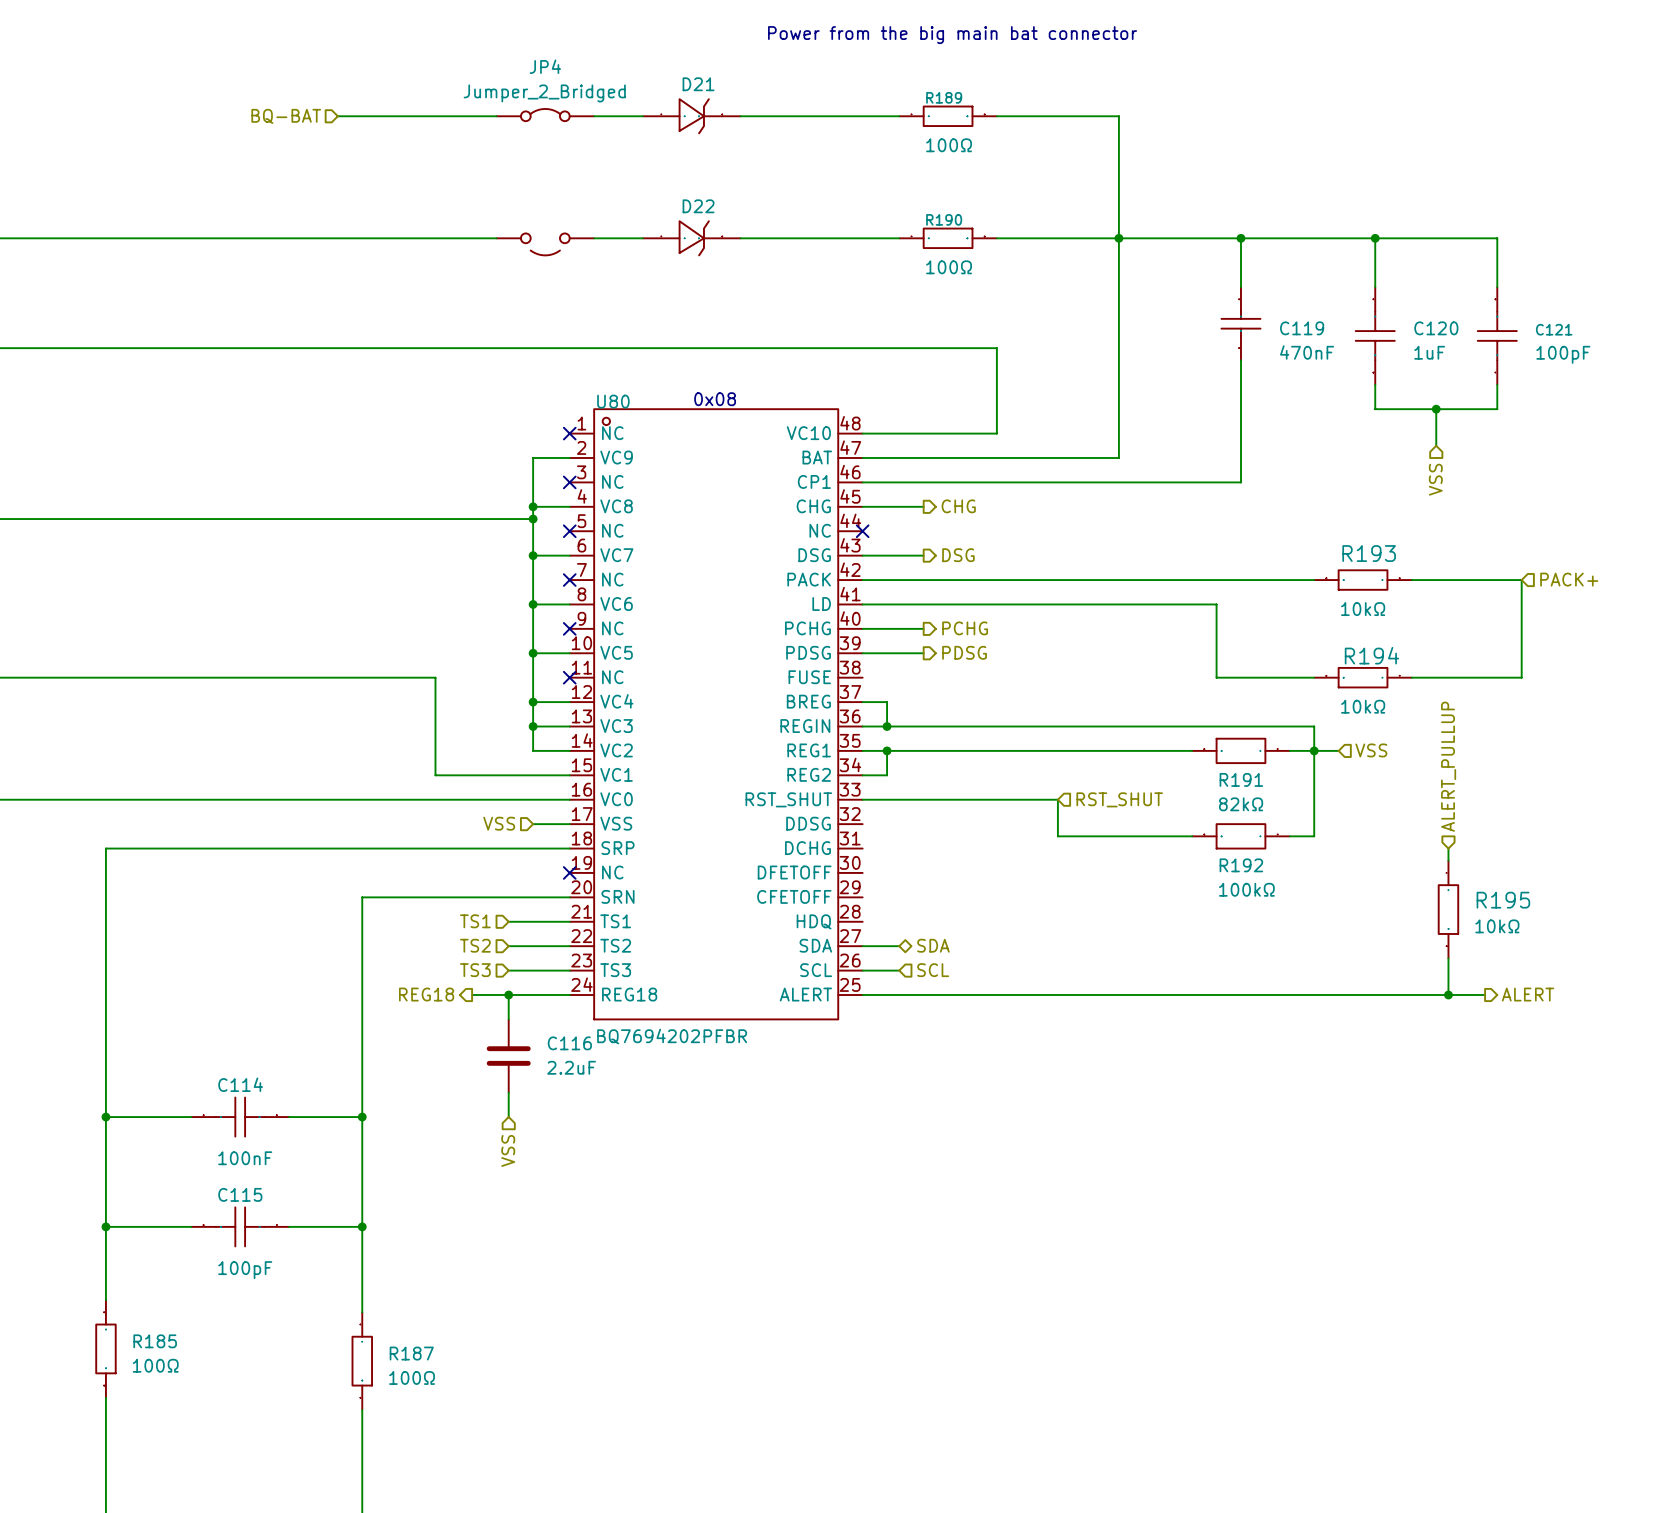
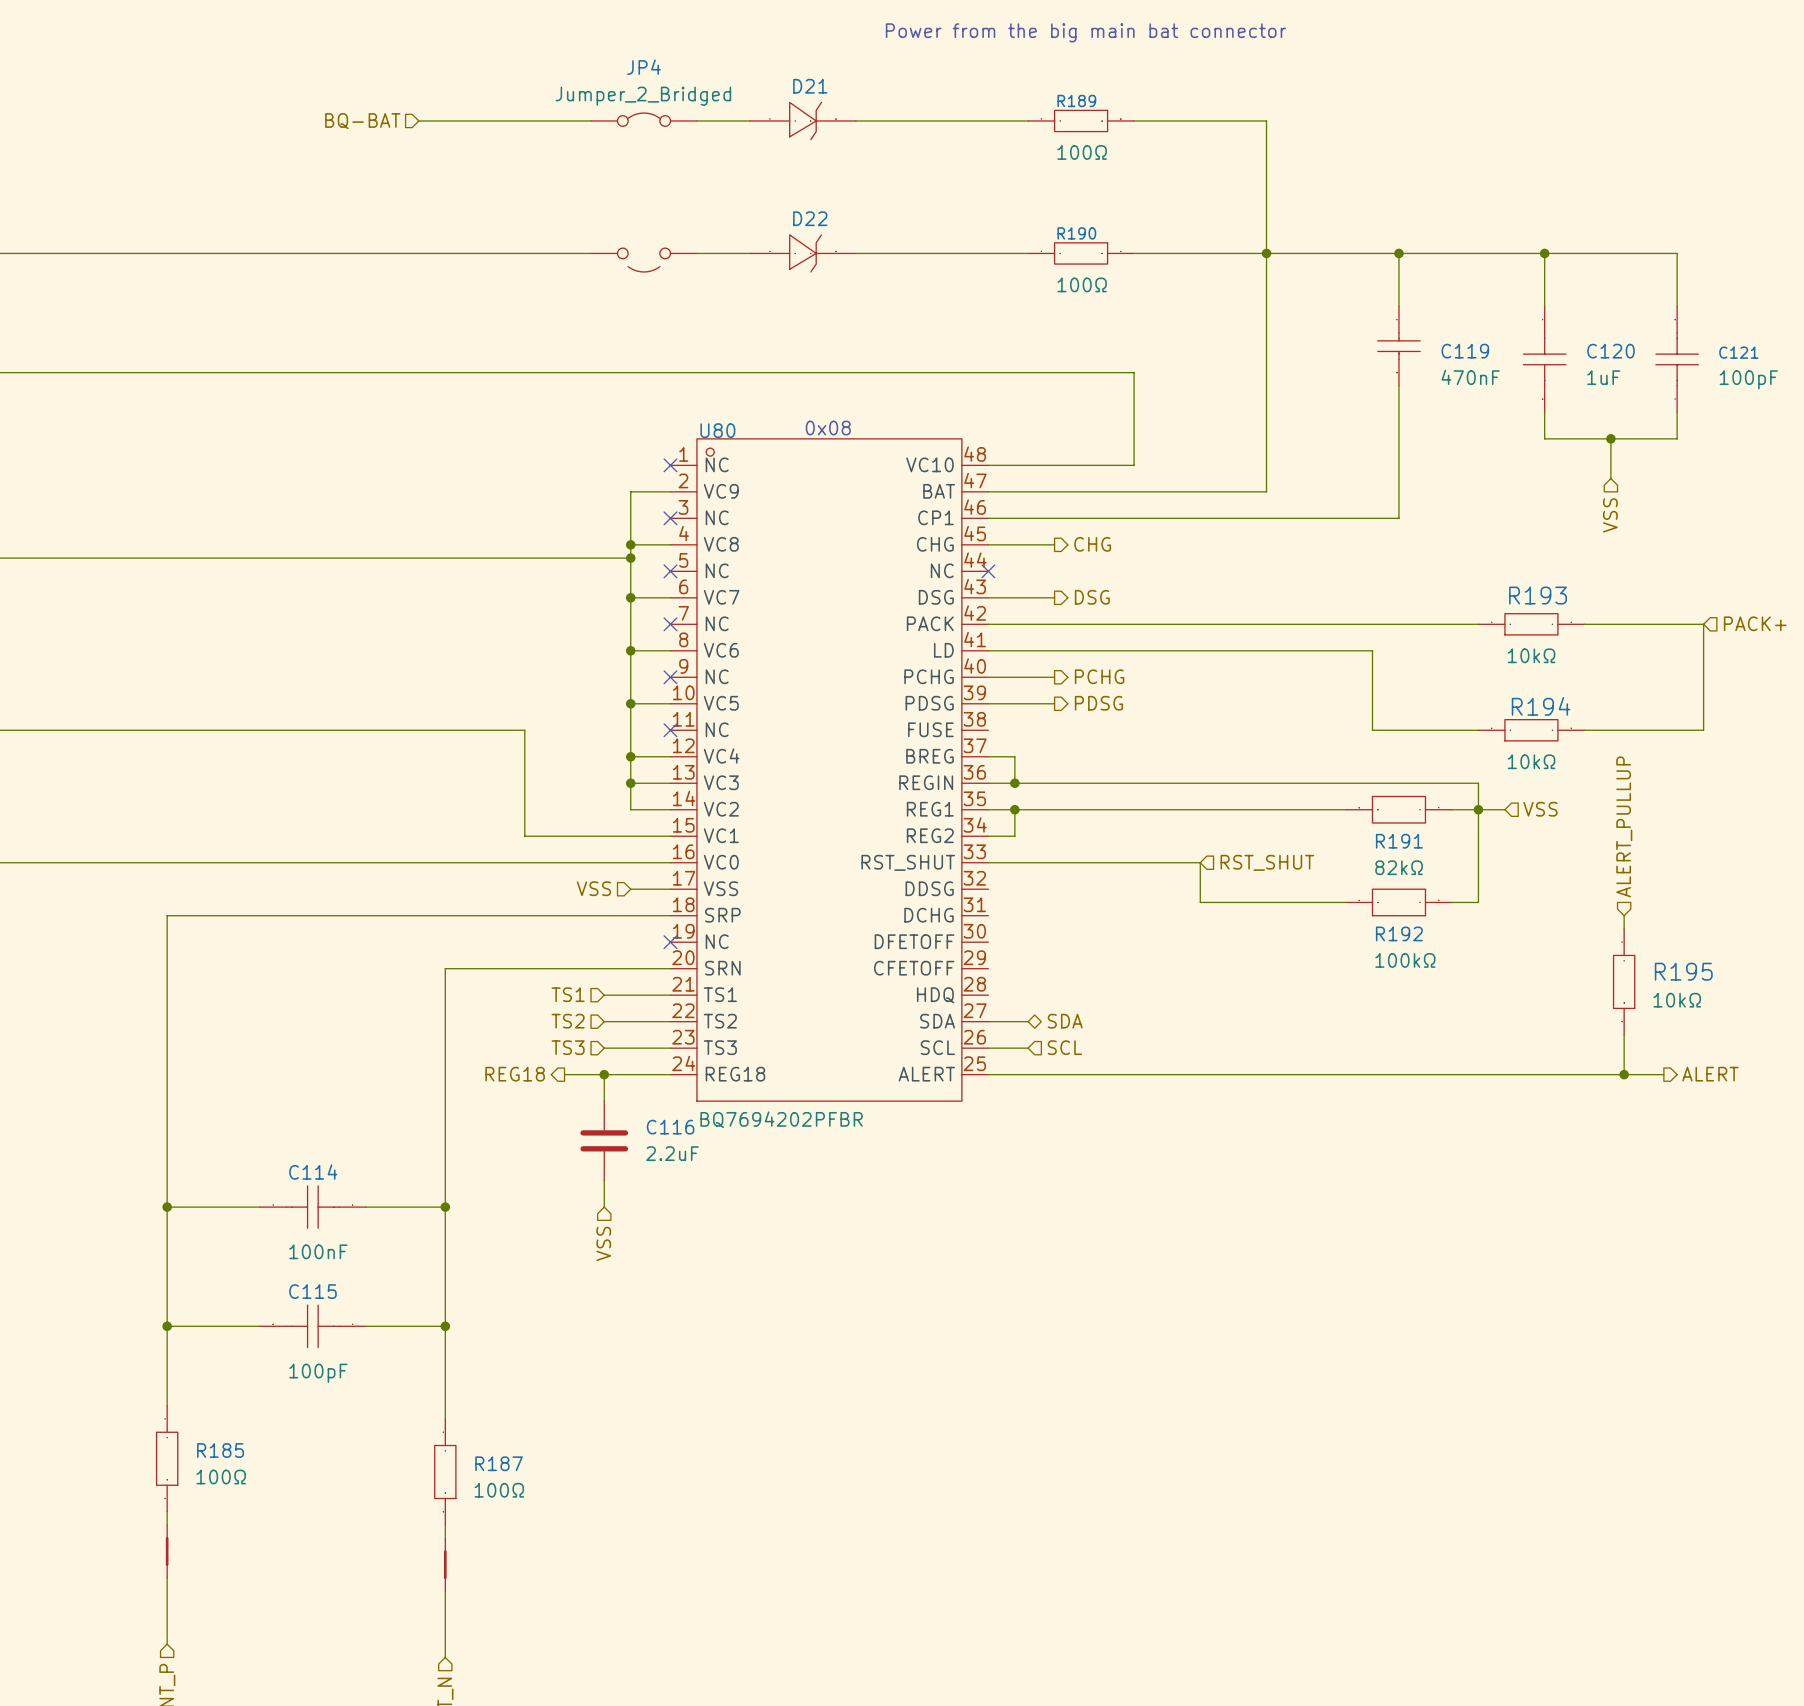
part: none -> (167, 1551)
part: none -> (445, 1564)

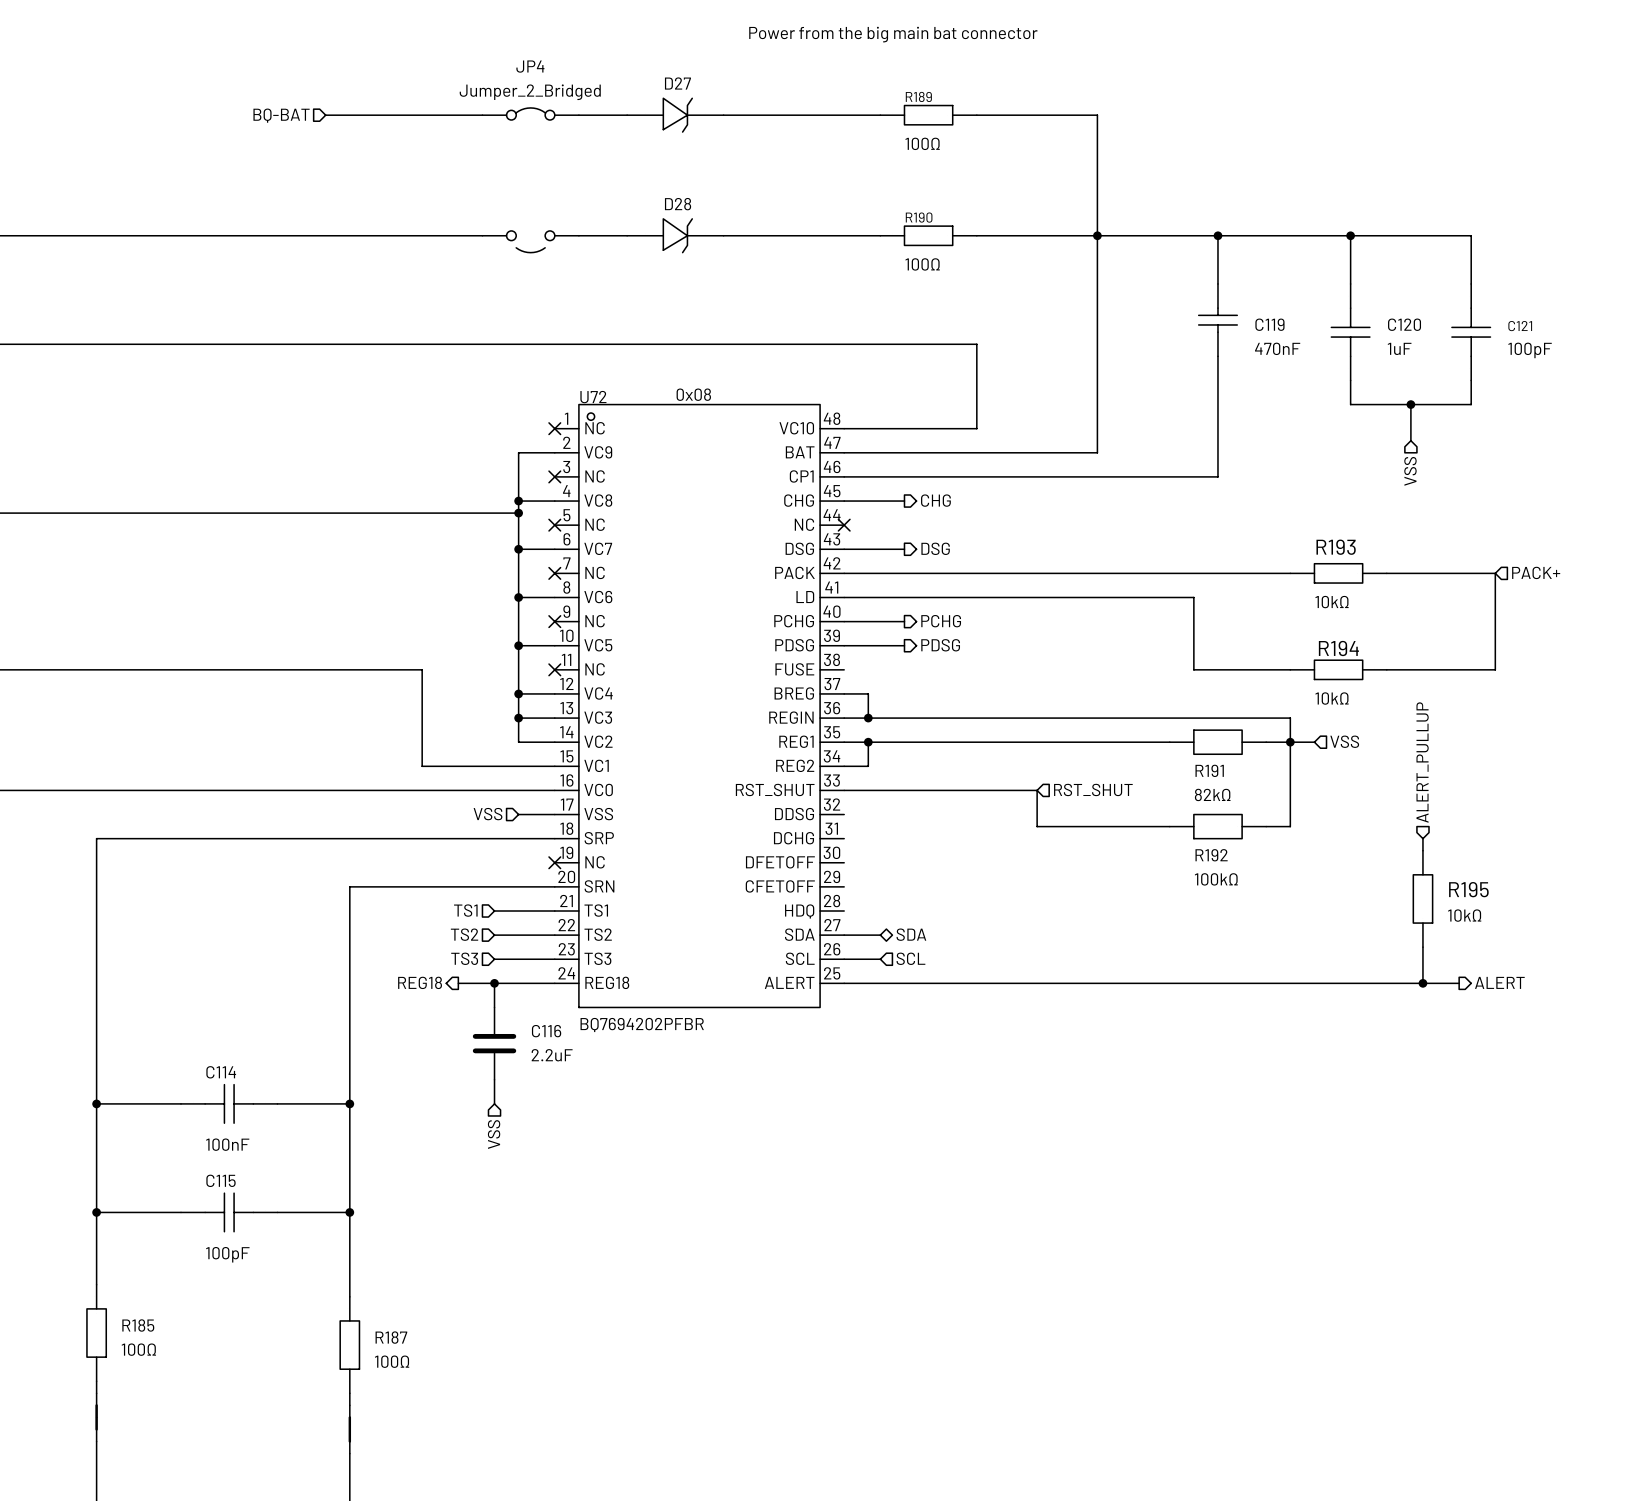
D21 name: D21 (810, 86) -> D27 (677, 83)
D22 name: D22 (810, 218) -> D28 (678, 204)
U80 name: U80 (717, 430) -> U72 (593, 397)

